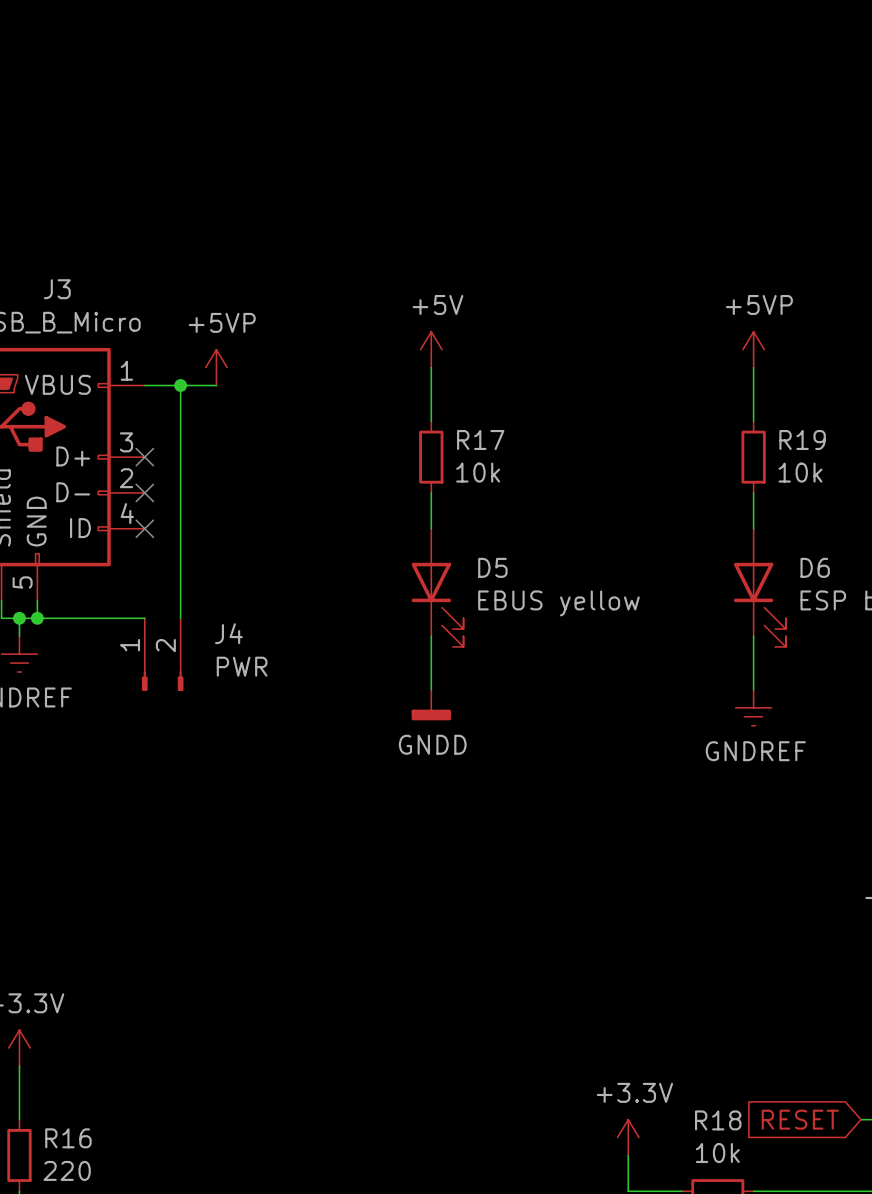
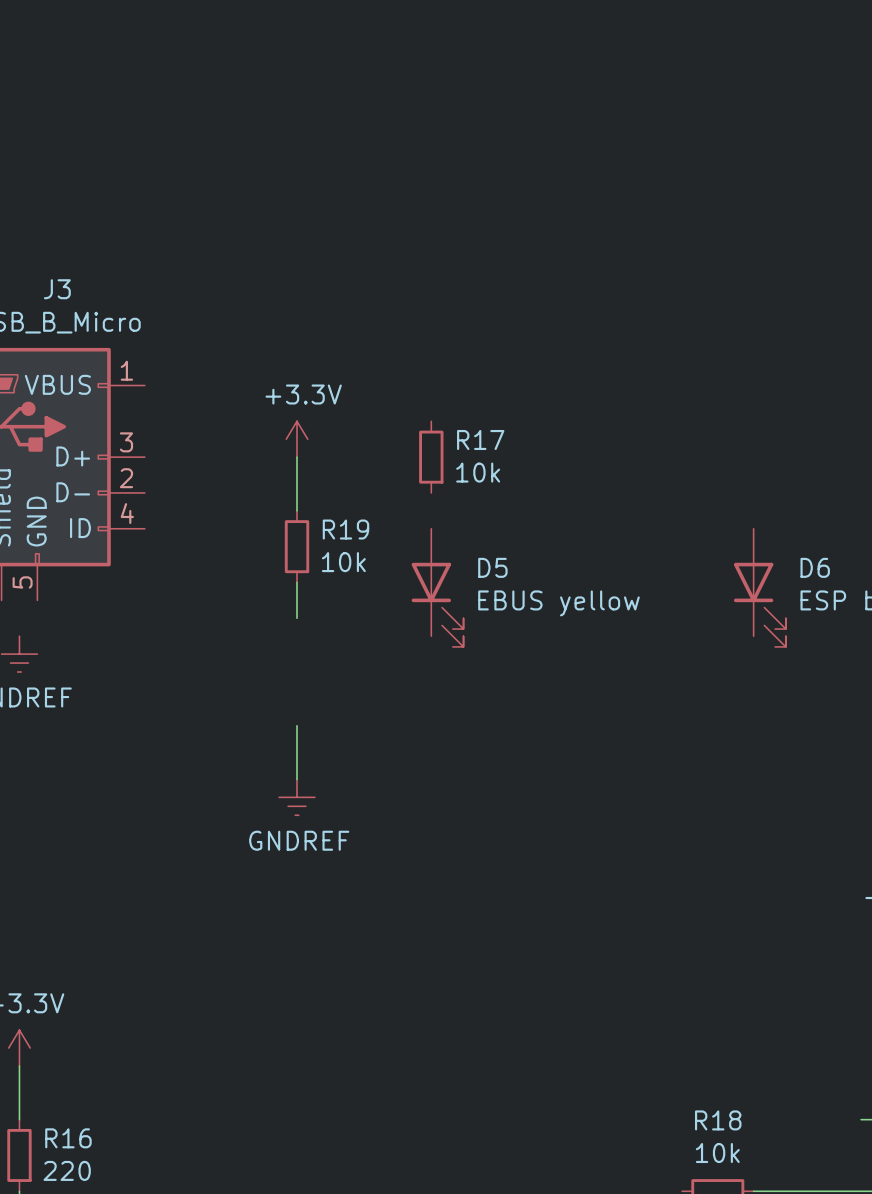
power symbol: +5V (431, 349) -> none
power symbol: +5VP (753, 349) -> none
power symbol: +5VP (216, 367) -> none
wire: (431, 367) (431, 421) -> (297, 457) (297, 510)
wire: (753, 367) (753, 421) -> none
wire: (144, 385) (216, 385) -> none
wire: (180, 385) (180, 618) -> none
junction: (180, 385) -> none
power symbol: none -> +3.3V (297, 439)
no-connect mark: (144, 457) -> none
R19 position: (753, 457) -> (297, 546)
no-connect mark: (144, 492) -> none
wire: (431, 492) (431, 528) -> (297, 582) (297, 618)
wire: (753, 492) (753, 528) -> none
no-connect mark: (144, 528) -> none
wire: (1, 600) (1, 618) (144, 618) -> none
wire: (37, 600) (37, 618) -> none
wire: (19, 618) (19, 636) -> none
junction: (19, 618) -> none
junction: (37, 618) -> none
wire: (431, 636) (431, 689) -> (297, 725) (297, 779)
wire: (753, 636) (753, 689) -> none
J4: PWR (162, 654) -> none
power symbol: GNDD (431, 705) -> none
power symbol: GNDREF (753, 707) -> none
power symbol: none -> GNDREF (297, 797)
global label: RESET (800, 1119) -> none
power symbol: +3.3V (628, 1137) -> none
wire: (628, 1155) (628, 1191) (681, 1191) -> none

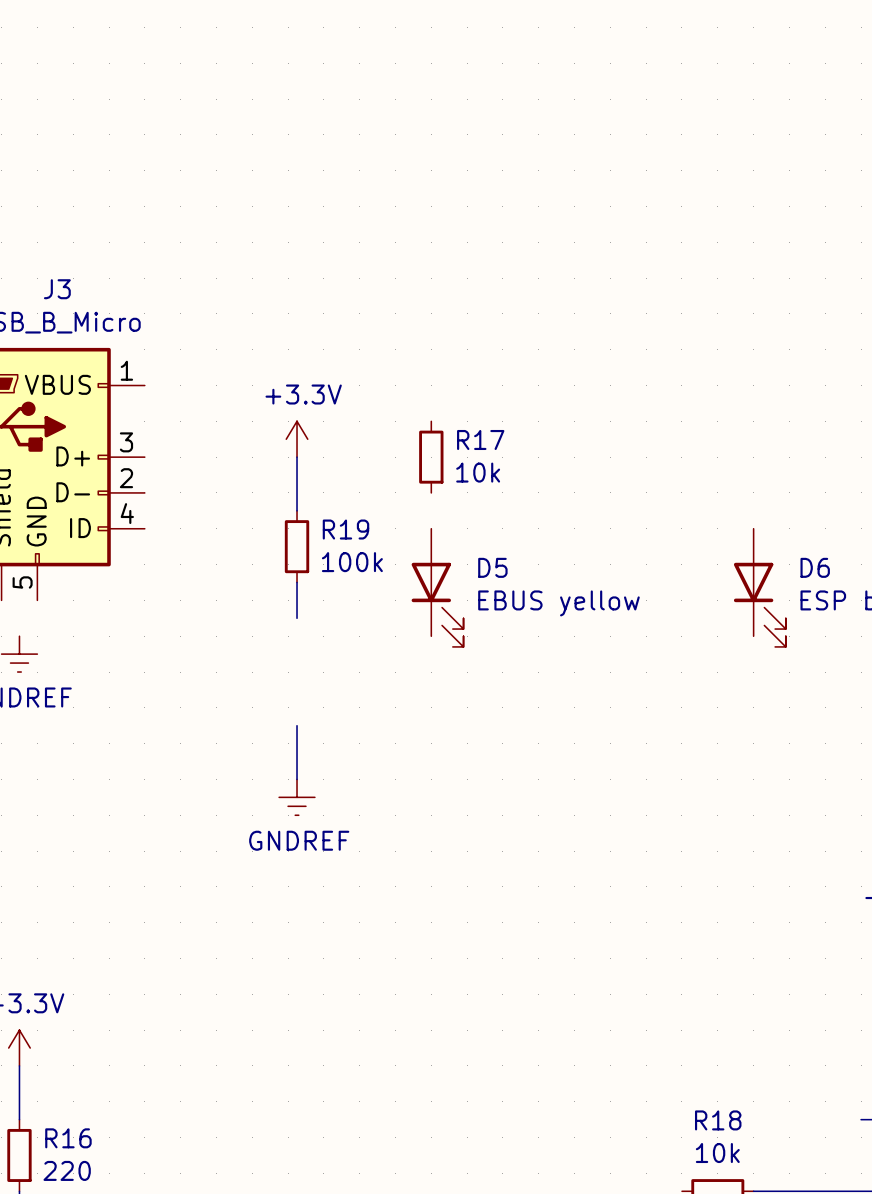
R19 value: 10k (343, 562) -> 100k (352, 562)

